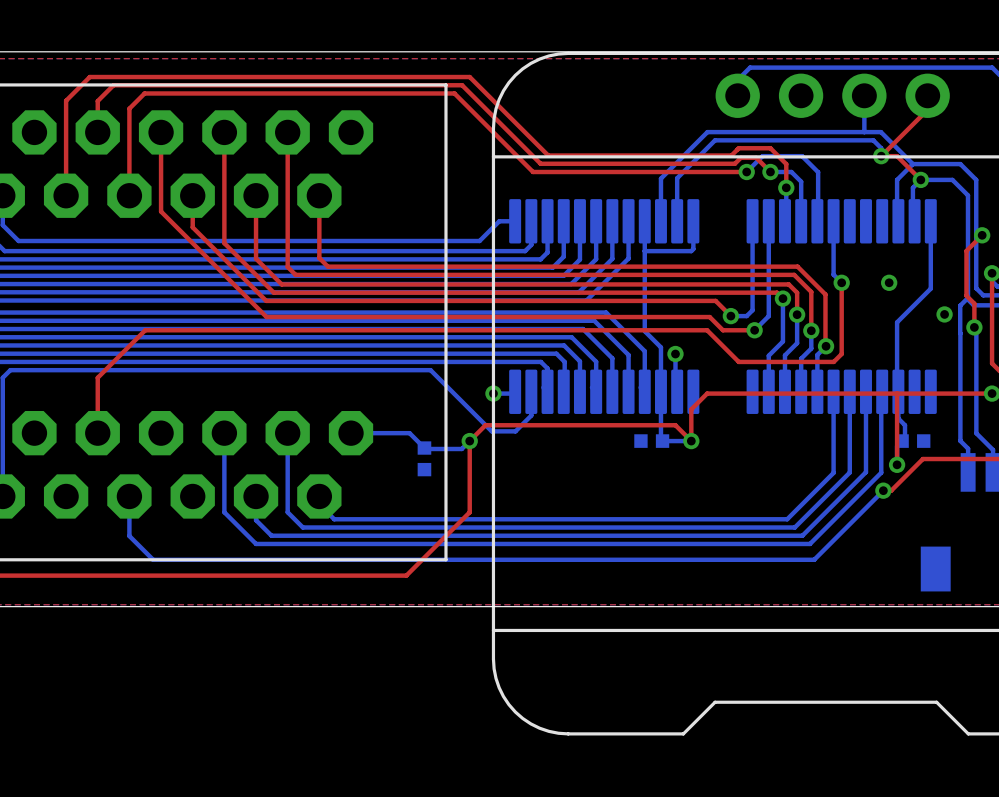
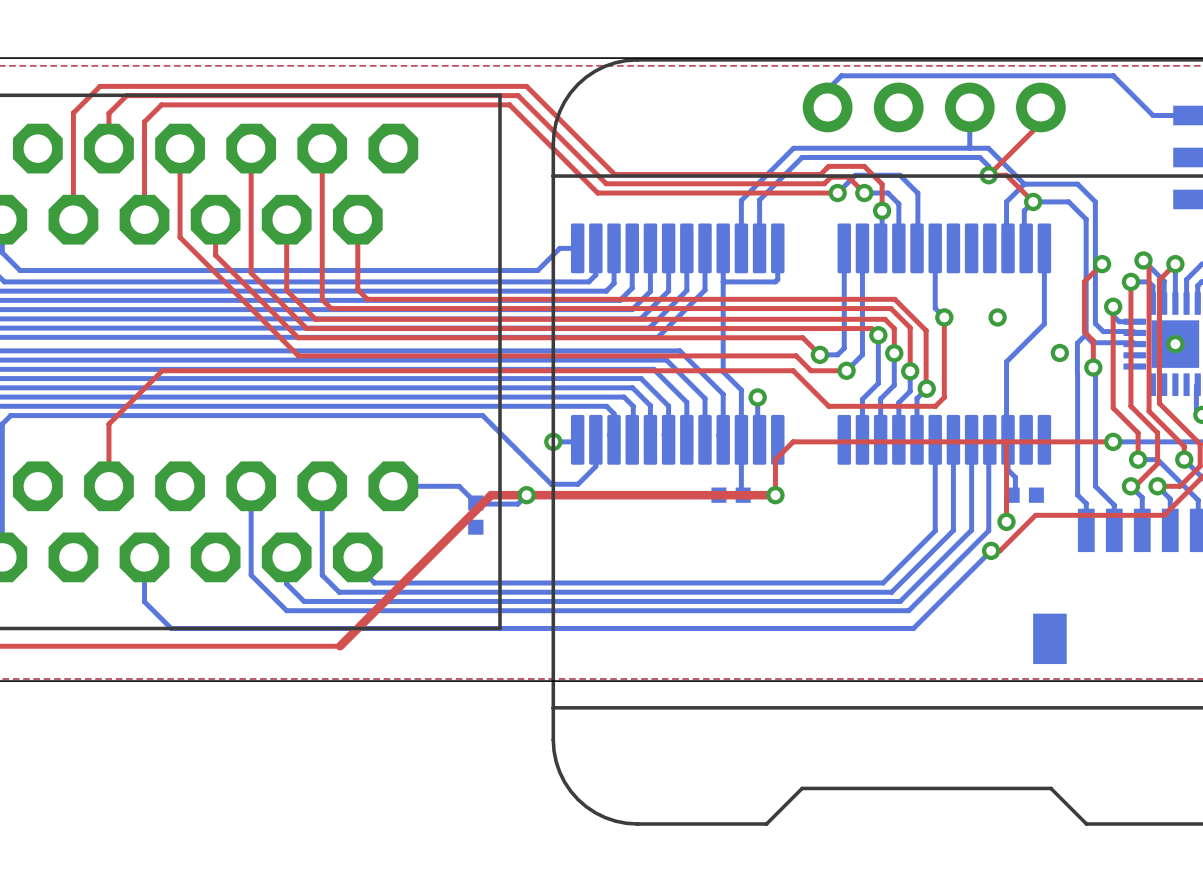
top track: (691, 441) (675, 425) (485, 425) (469, 441) (469, 512) (406, 575) (303, 575) -> (775, 495) (491, 495) (340, 646)

